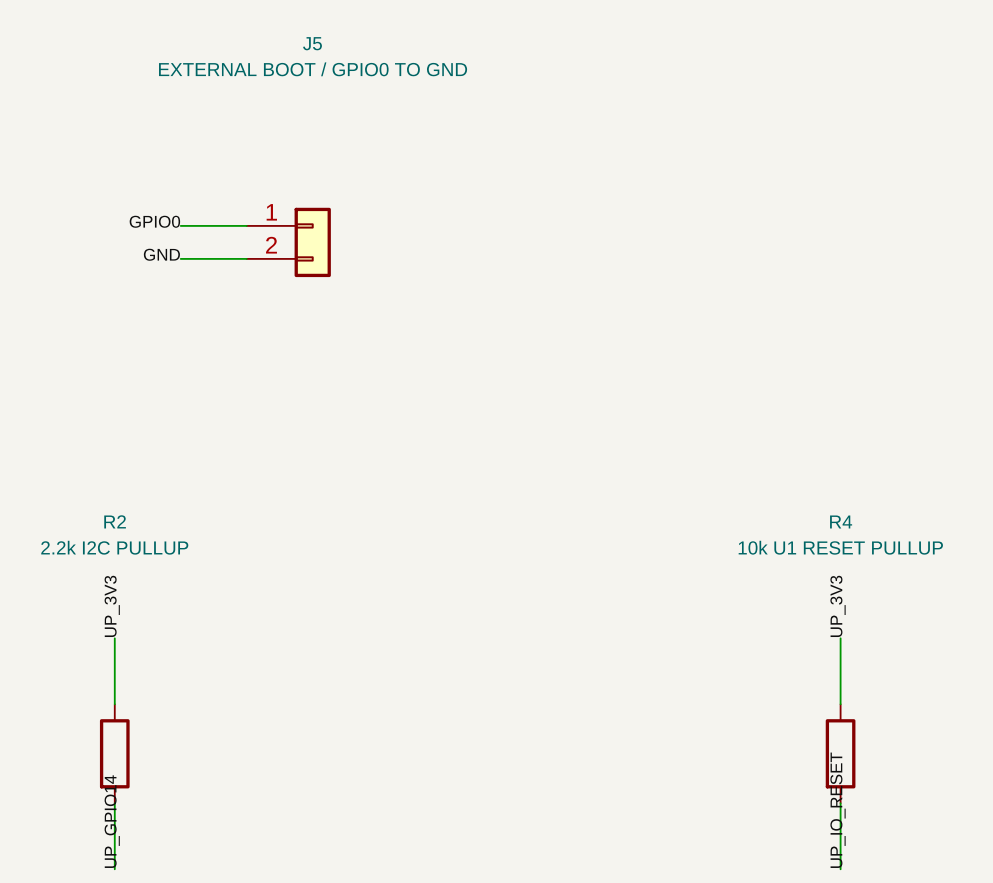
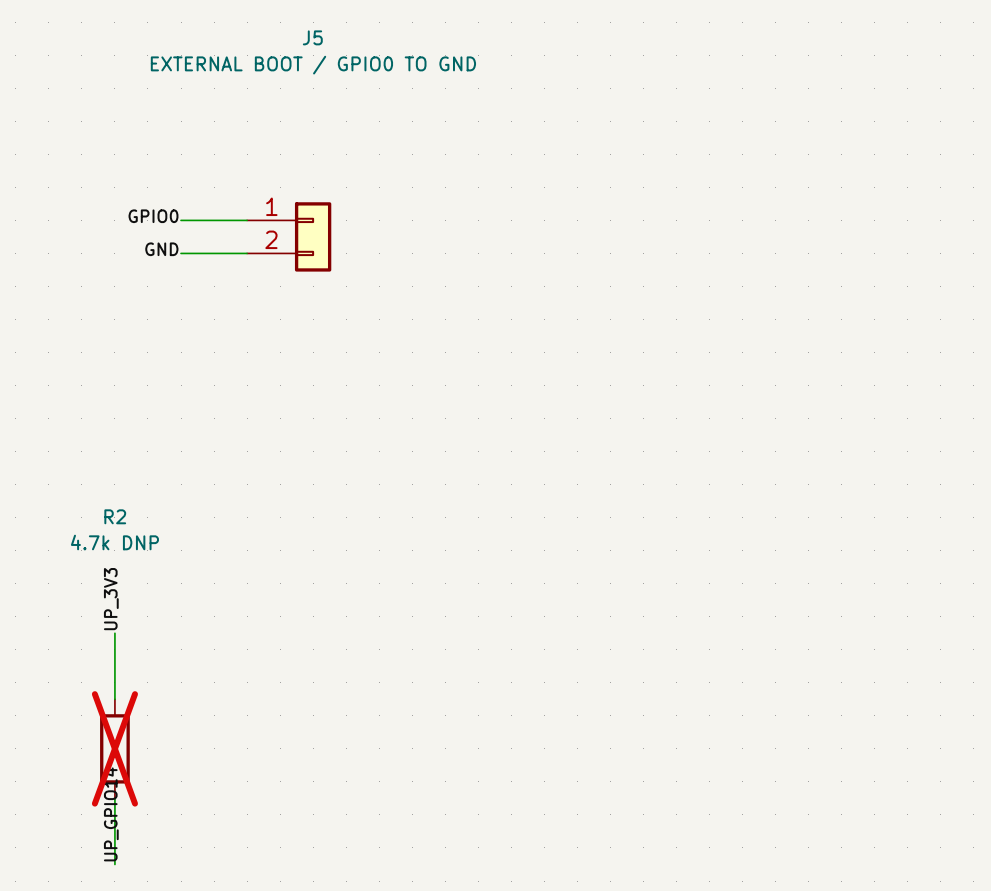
R2 value: 2.2k I2C PULLUP (114, 547) -> 4.7k DNP (114, 542)
label: UP_3V3 (838, 606) -> none
wire: (840, 638) (840, 704) -> none
R2 do-not-place cross: none -> (114, 748)
R4: 10k U1 RESET PULLUP (840, 753) -> none
wire: (840, 803) (840, 869) -> none
label: UP_IO_RESET (838, 810) -> none

